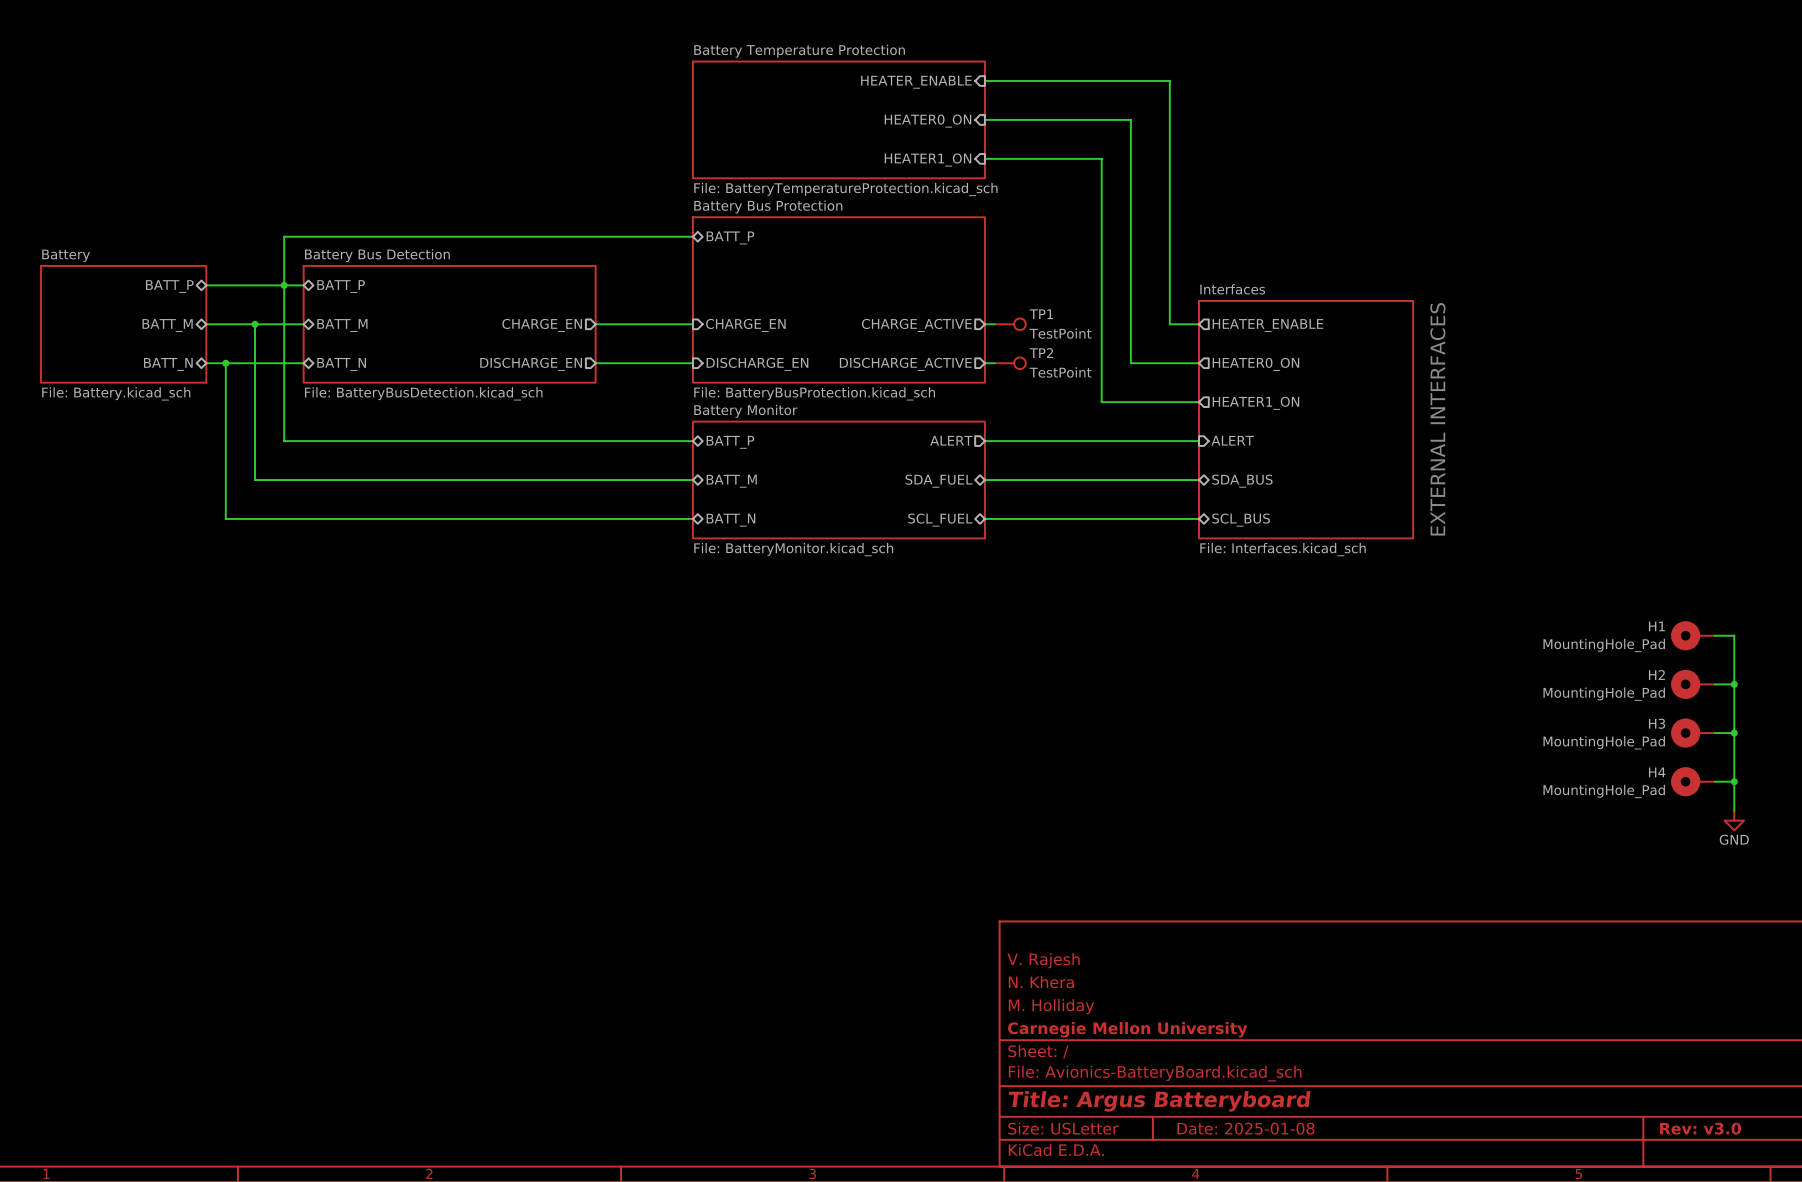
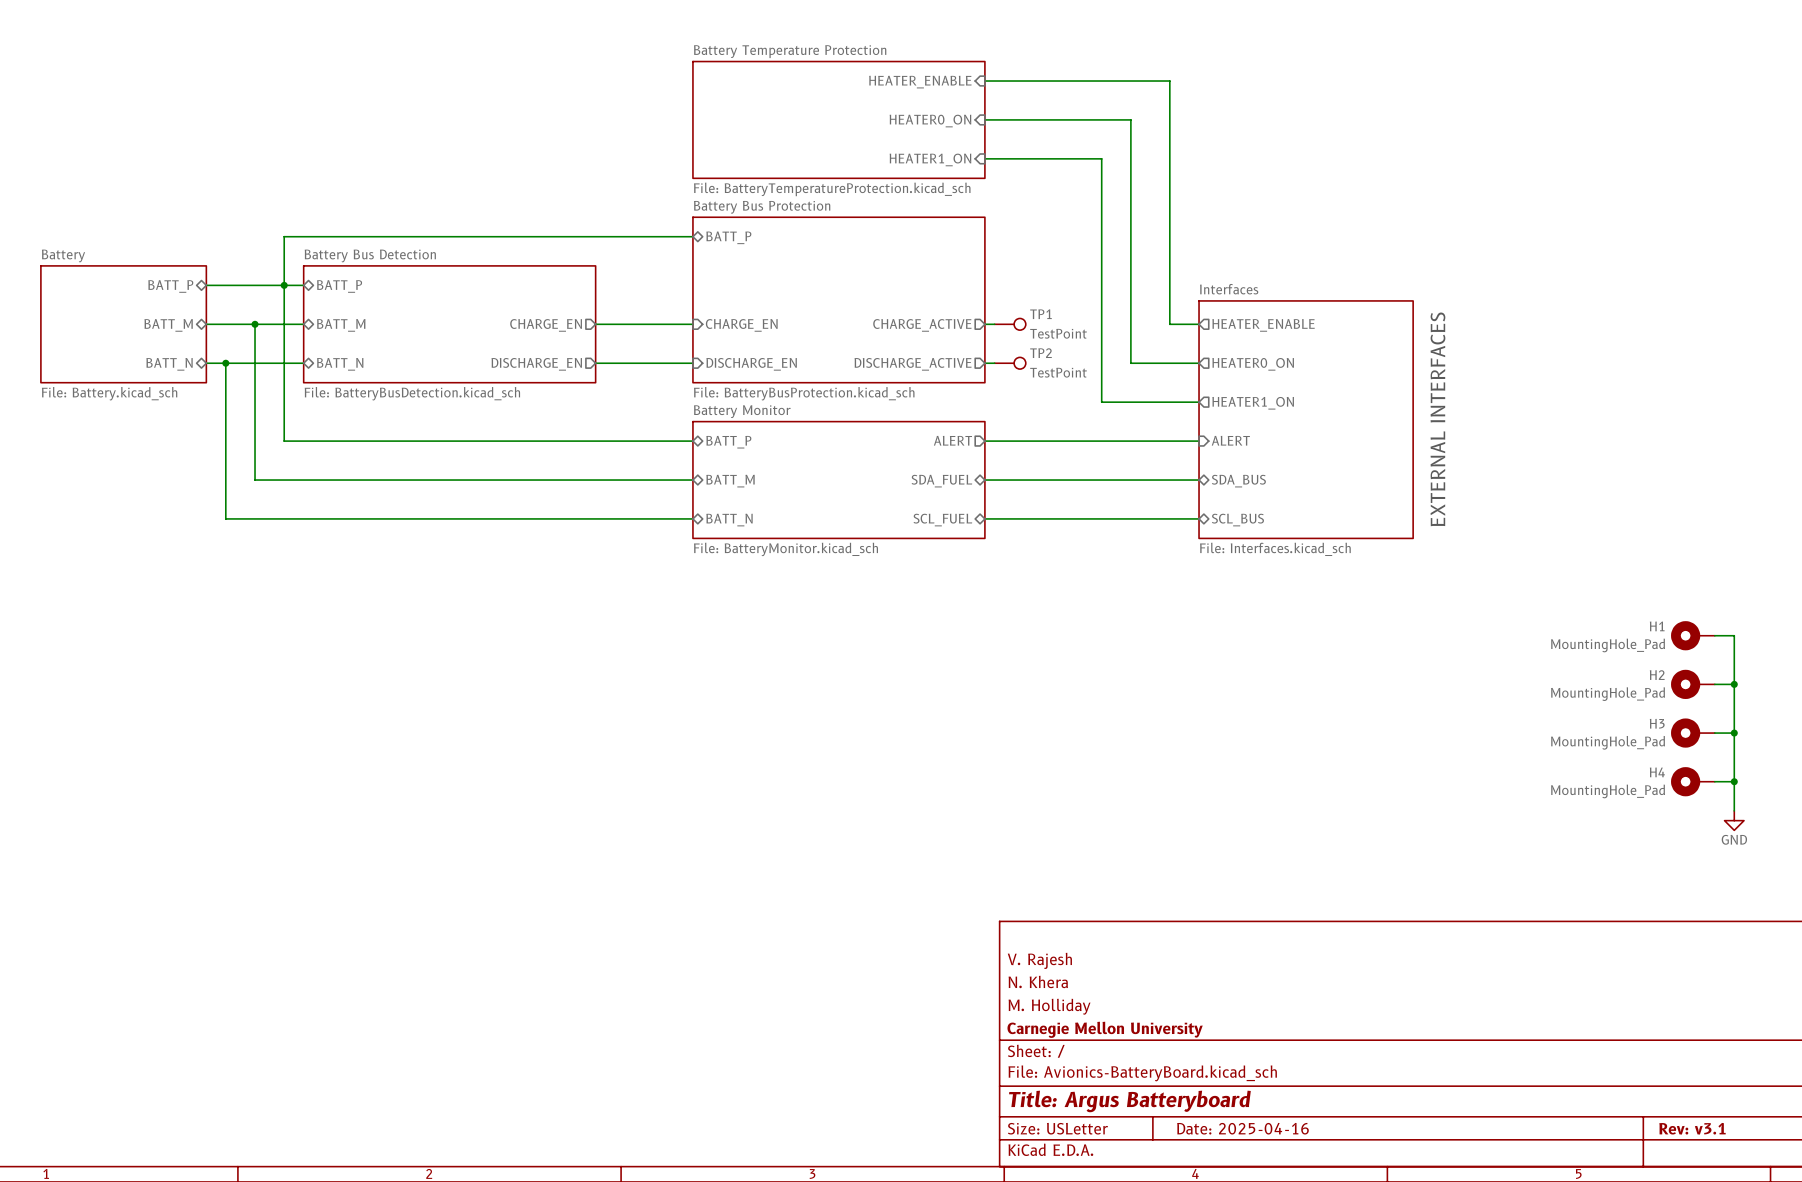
title block: Date: 2025-01-08 (1245, 1128) -> Date: 2025-04-16 (1242, 1128)
title block: Rev: v3.0 (1700, 1128) -> Rev: v3.1 (1692, 1128)

